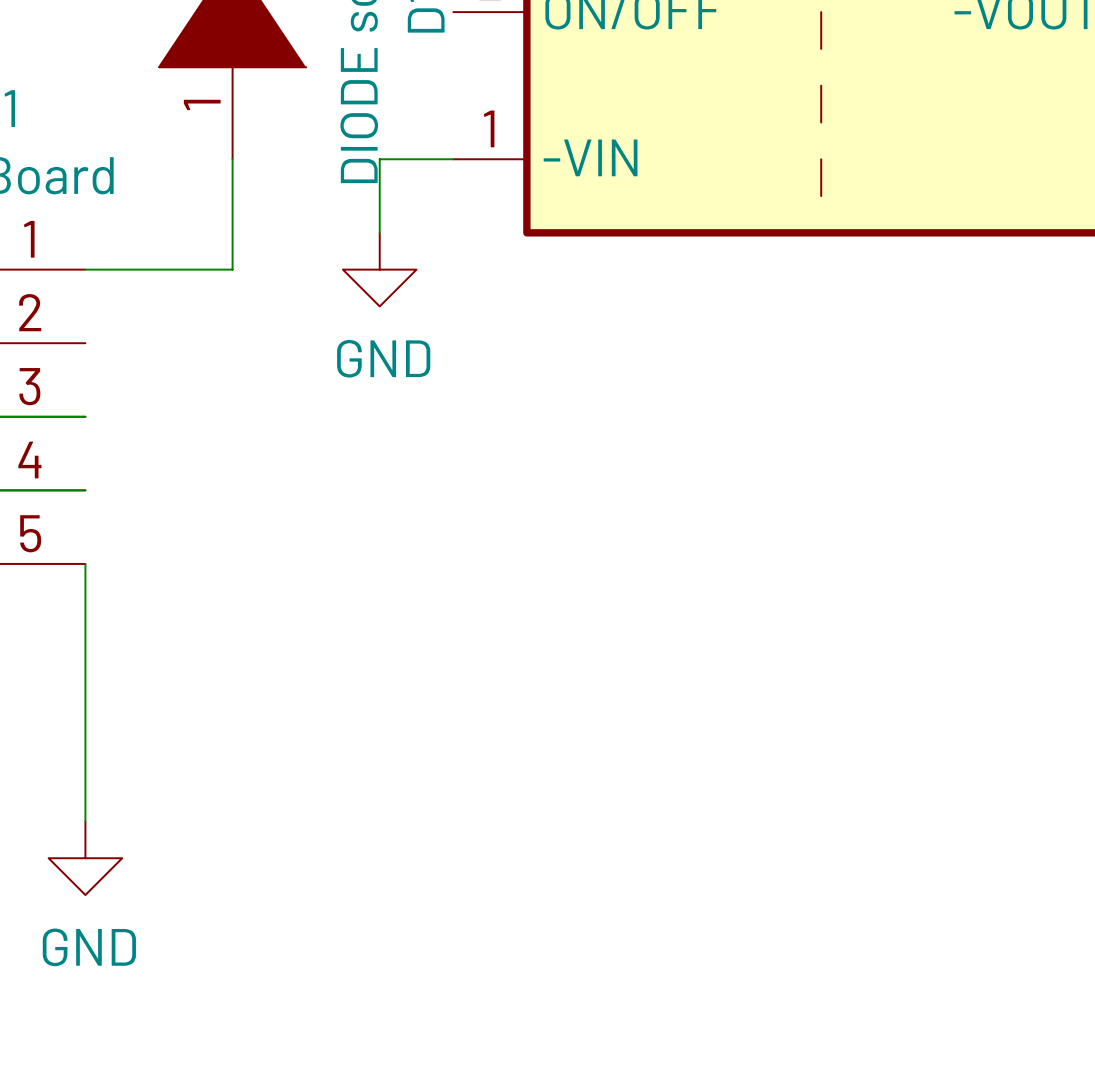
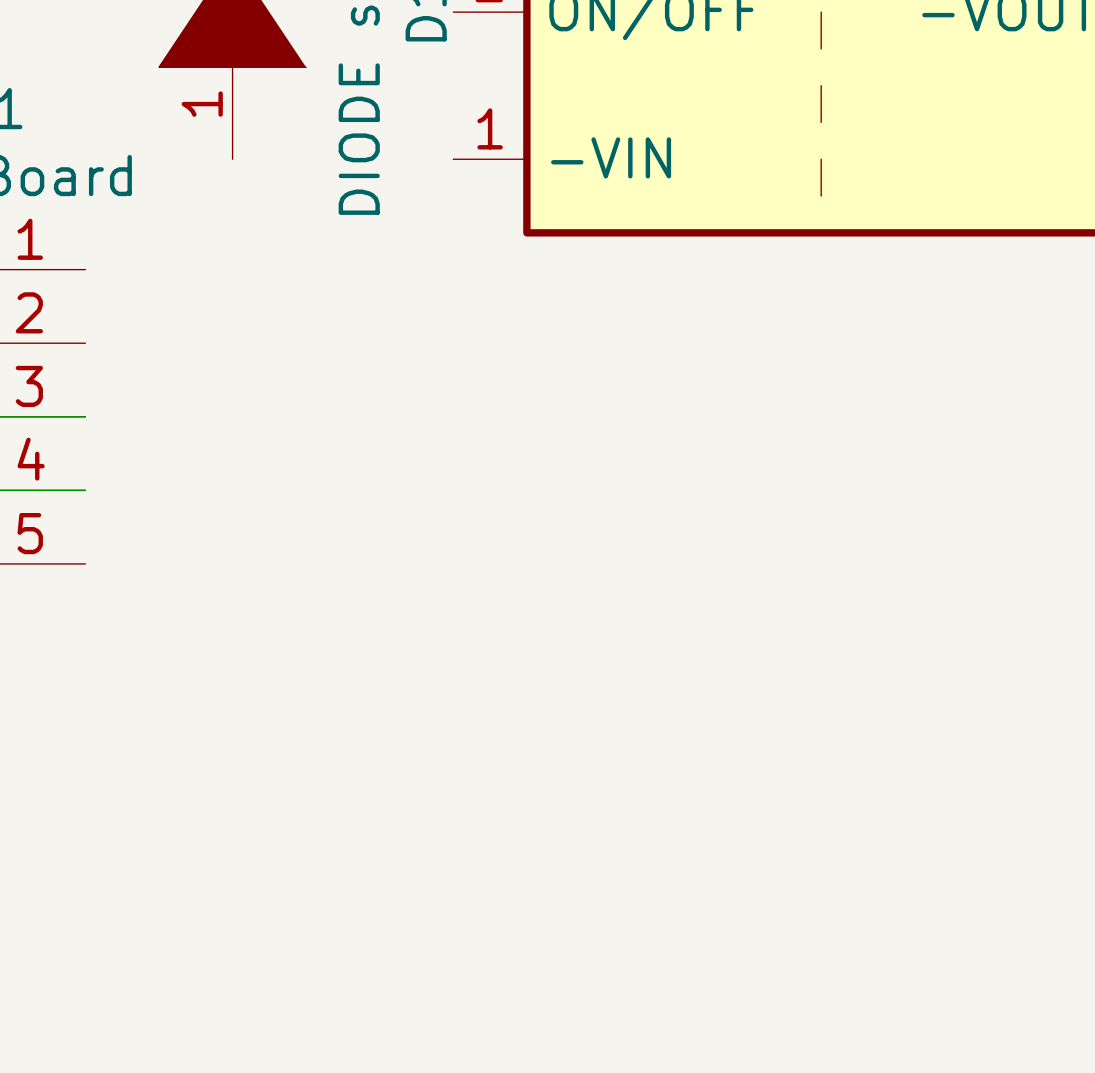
wire: (232, 159) (232, 269) (85, 269) -> none
wire: (453, 159) (379, 159) (379, 232) -> none
power symbol: GND (379, 269) -> none
wire: (85, 563) (85, 821) -> none
power symbol: GND (85, 858) -> none

